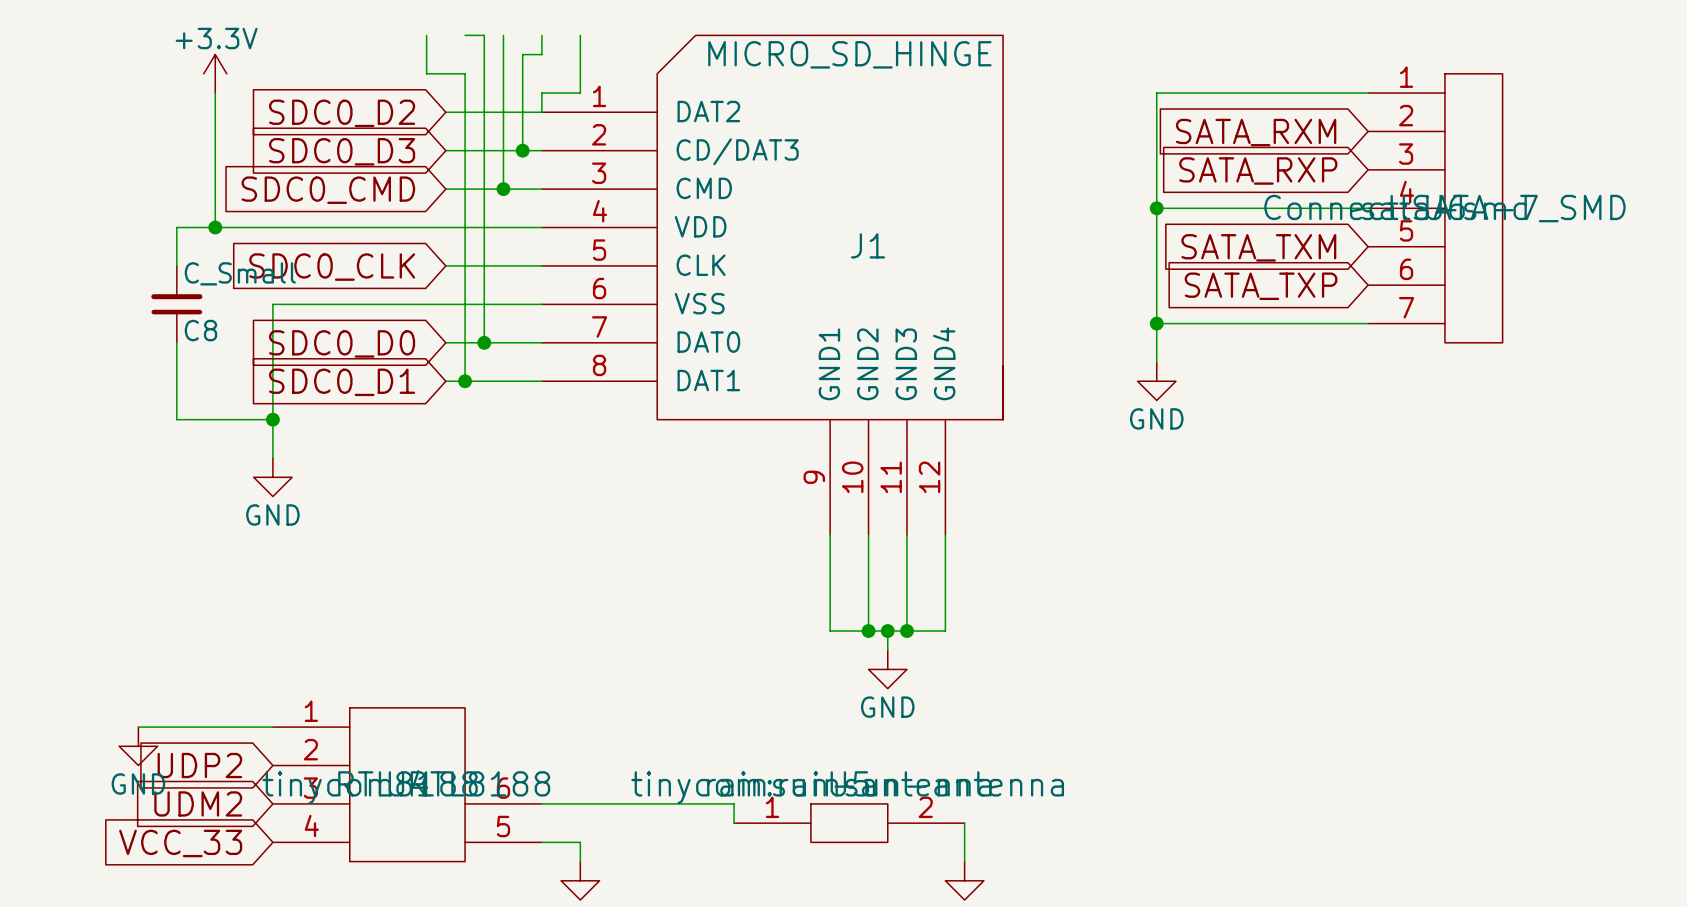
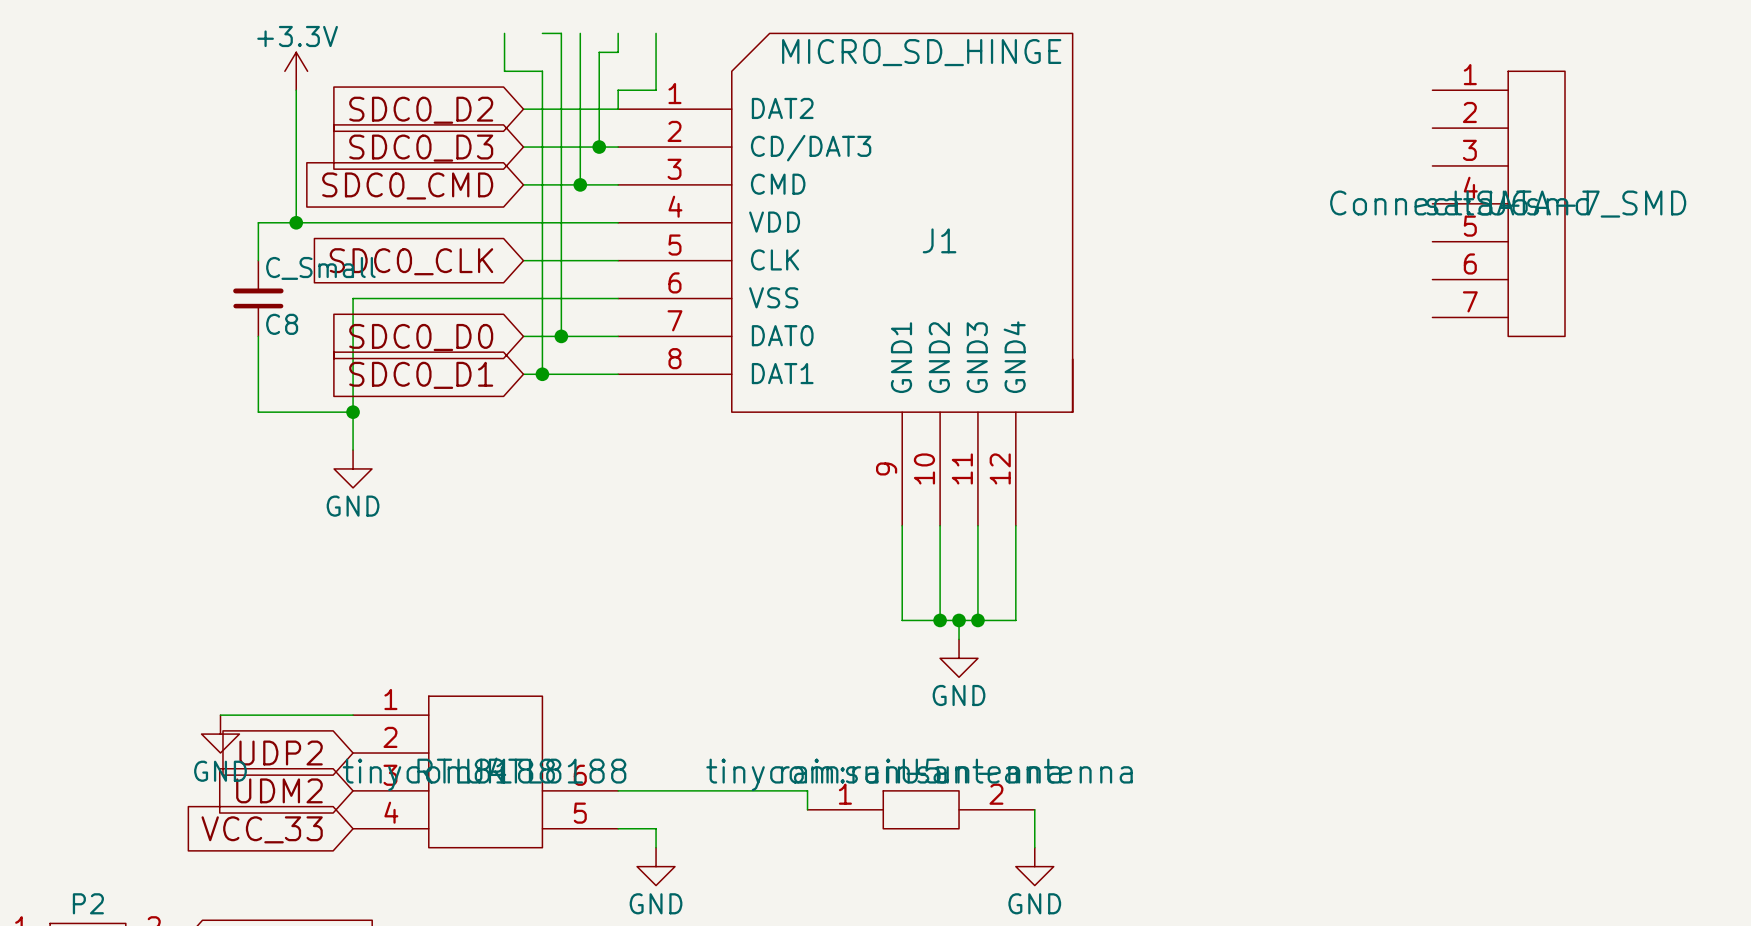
wire: (1368, 93) (1156, 93) (1156, 362) -> none
global label: SATA_RXM (1256, 132) -> none
global label: SATA_RXP (1258, 170) -> none
wire: (1156, 208) (1368, 208) -> none
junction: (1156, 208) -> none
global label: SATA_TXM (1258, 247) -> none
global label: SATA_TXP (1261, 286) -> none
wire: (1156, 323) (1368, 323) -> none
junction: (1156, 323) -> none
power symbol: GND (1156, 381) -> none

